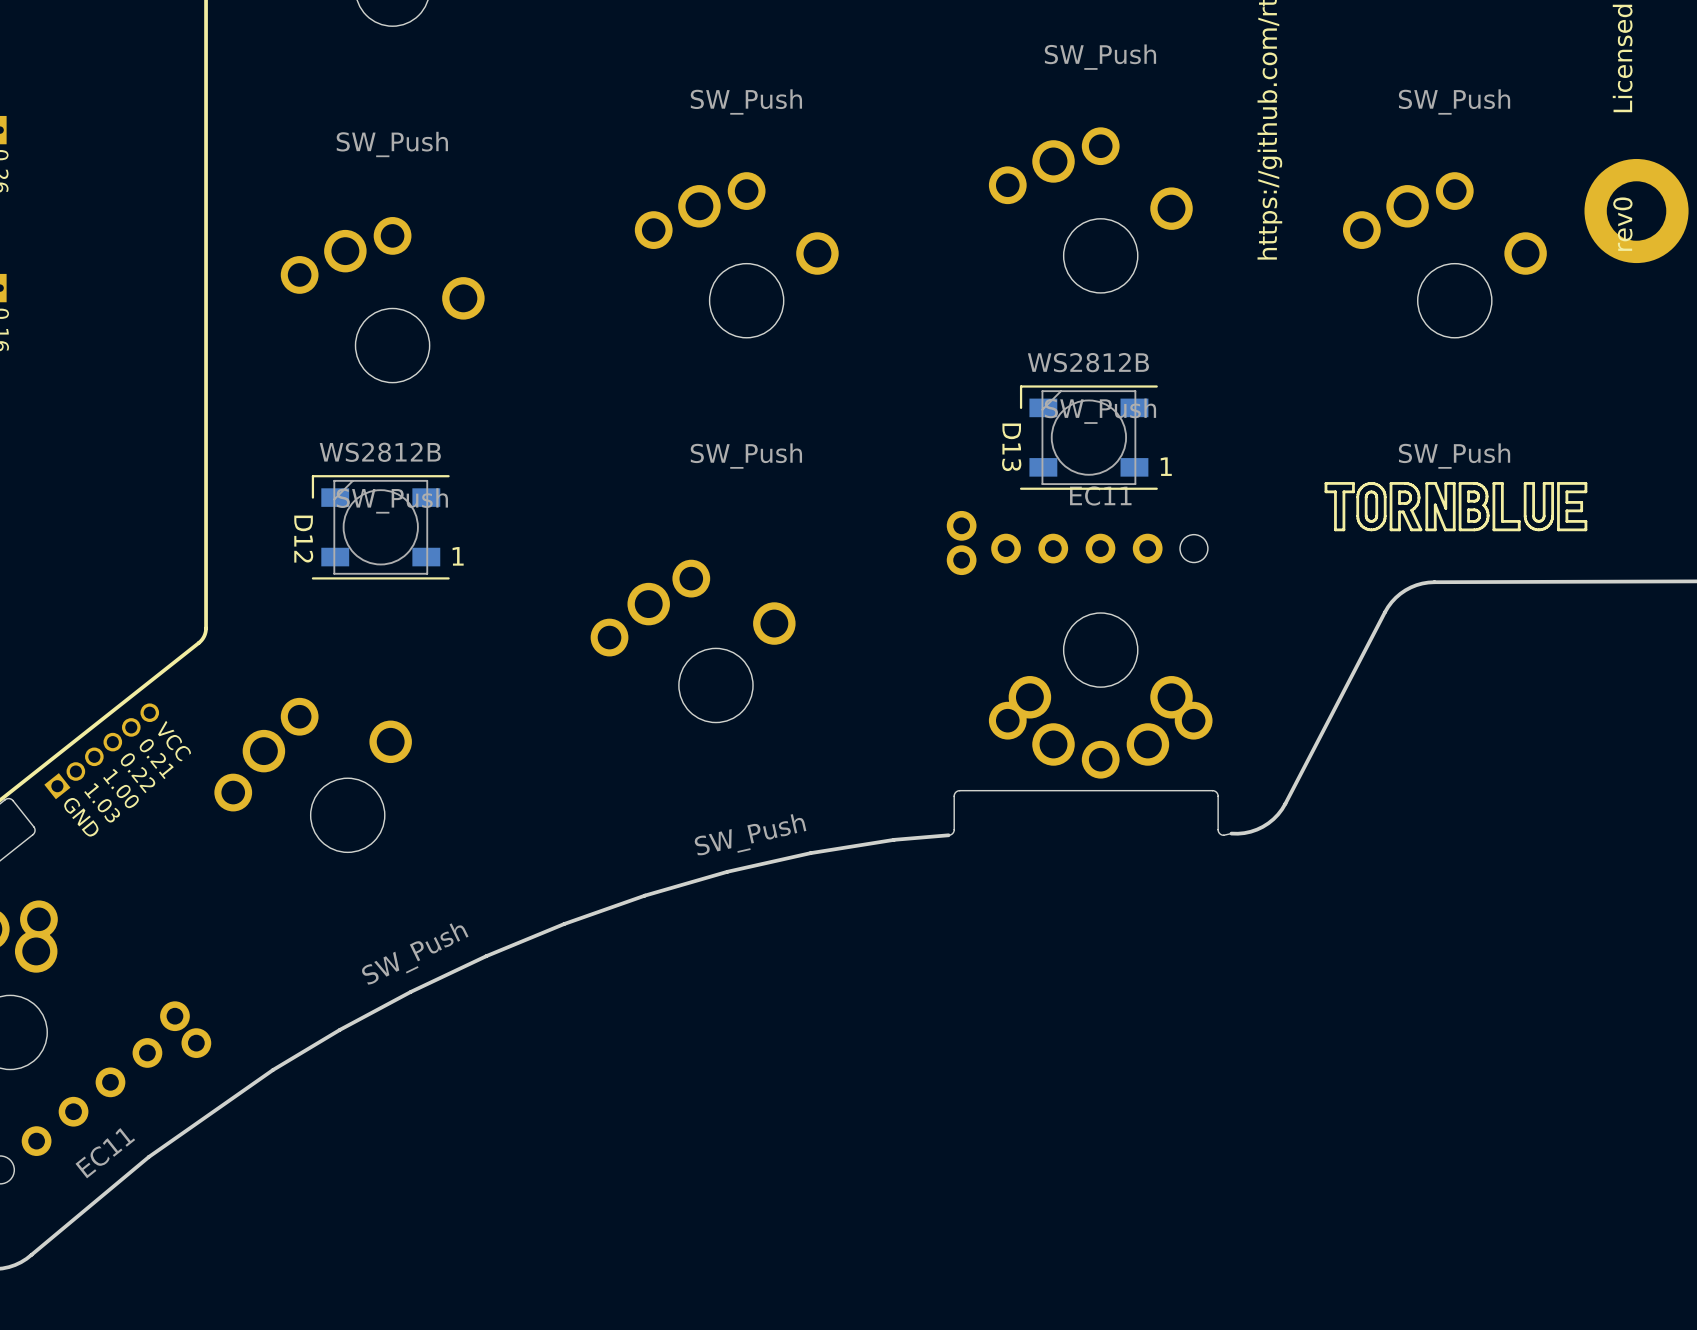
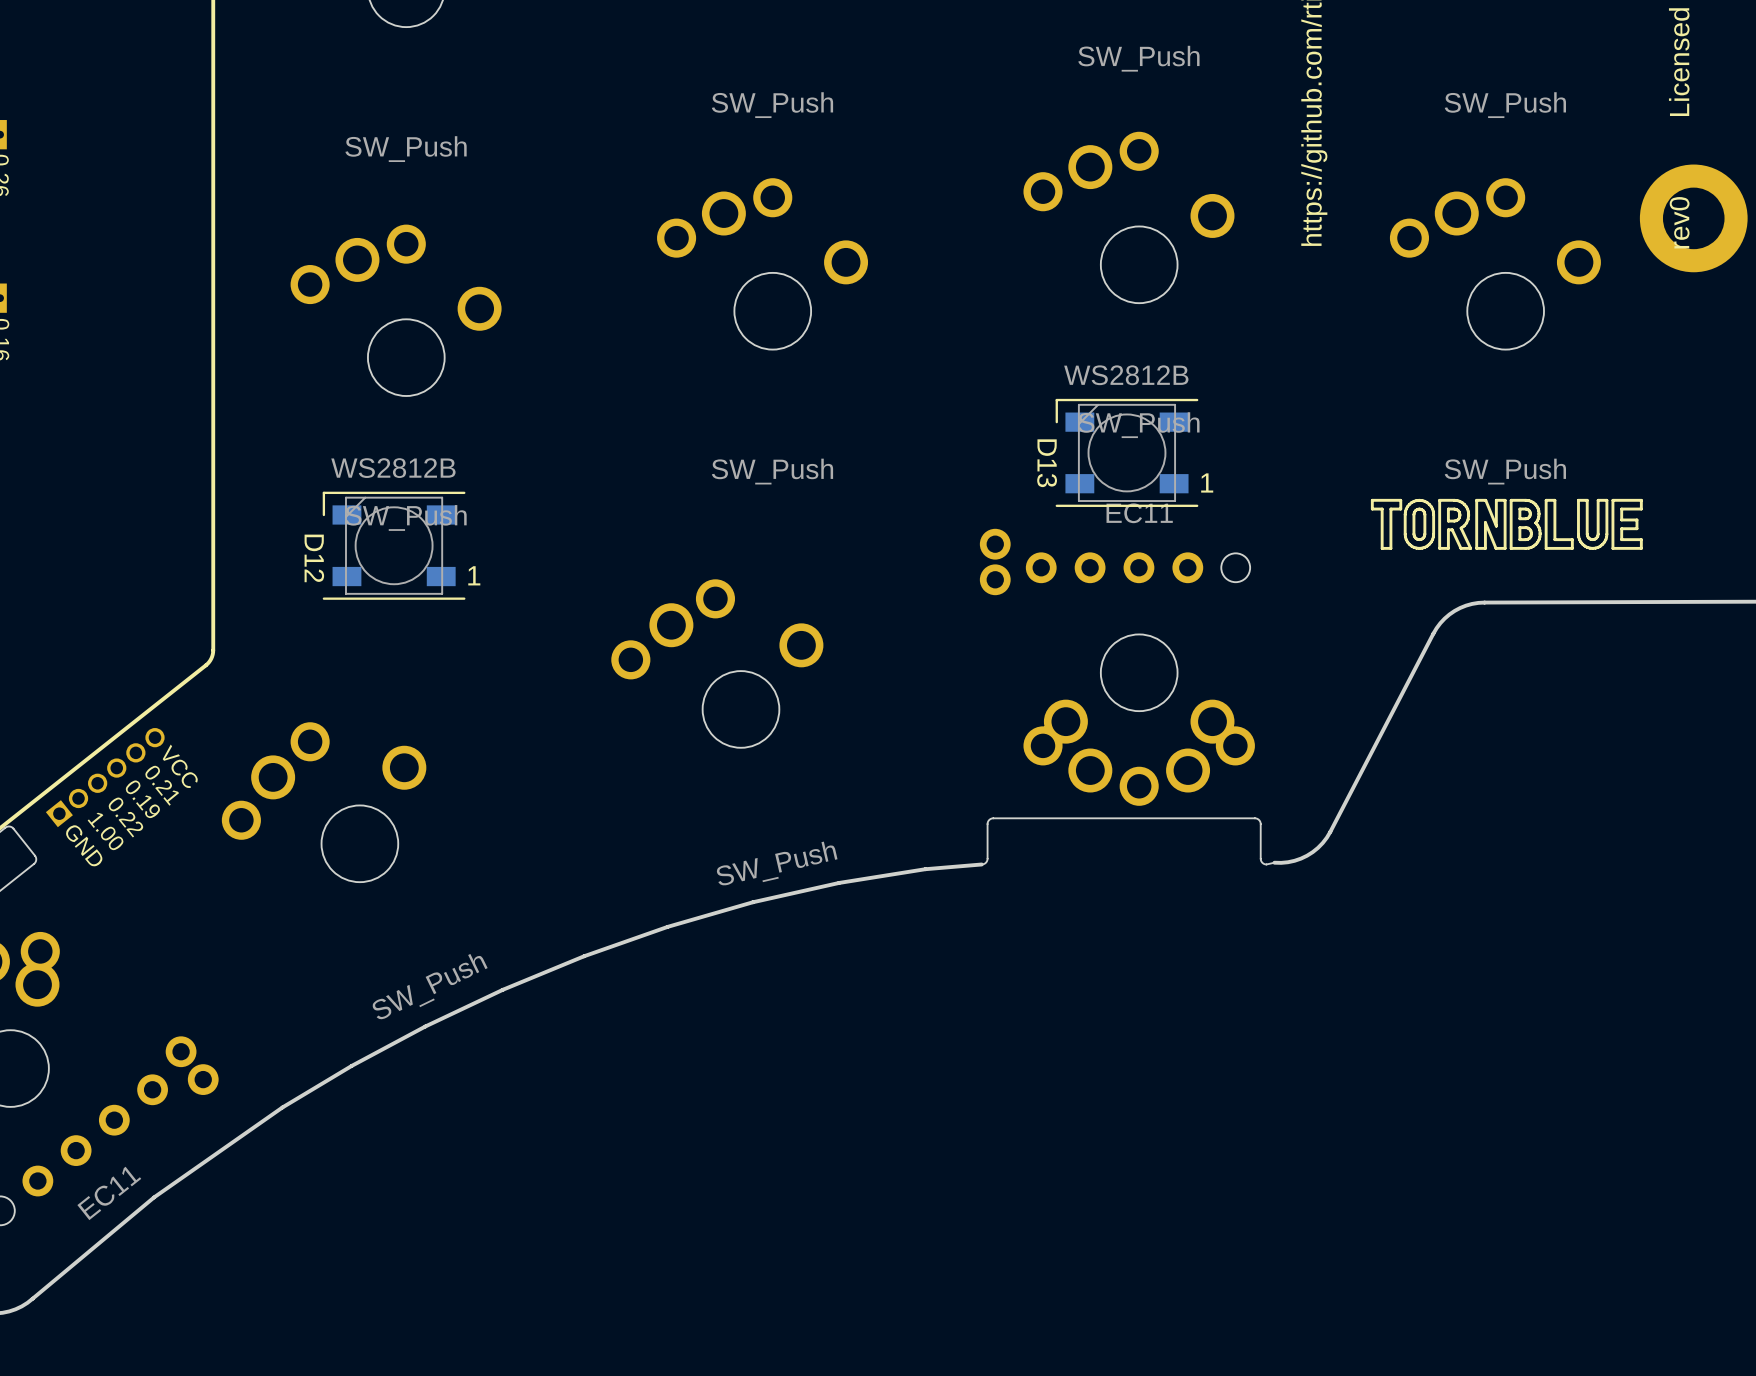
text: 0.22 (137, 773) -> 0.19 (142, 799)
text: 1.00 (121, 788) -> 0.22 (125, 817)
text: 1.03 (102, 802) -> 1.00 (105, 831)

